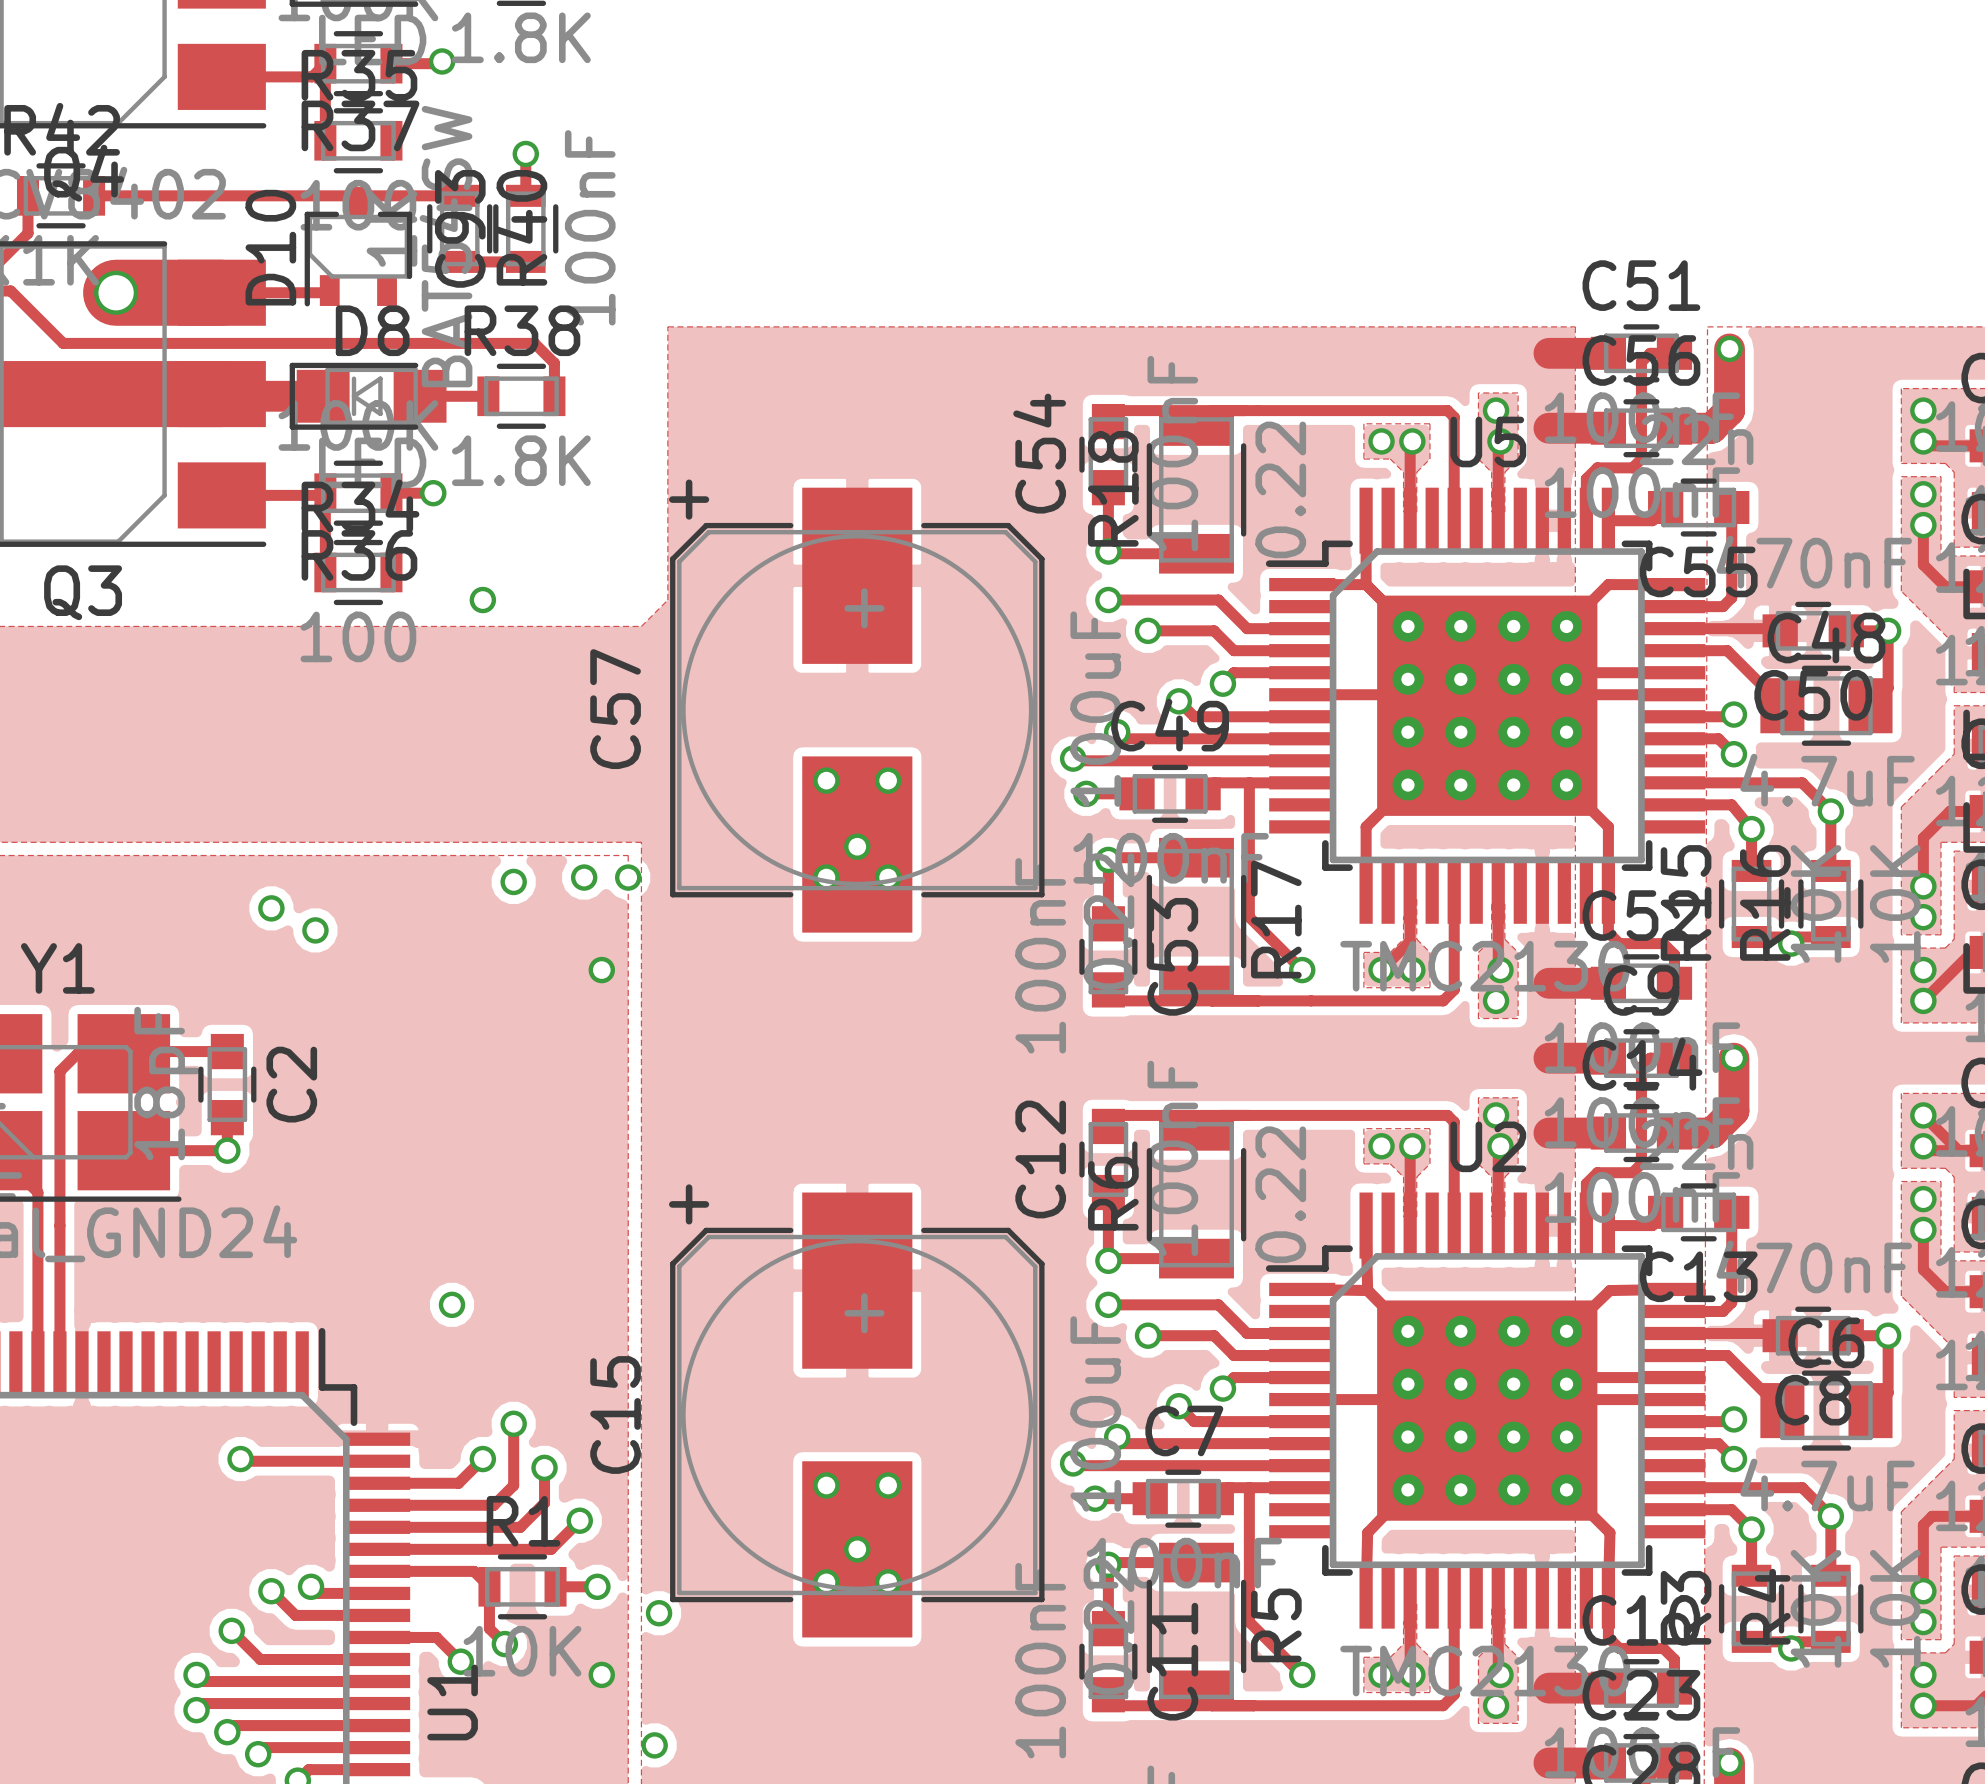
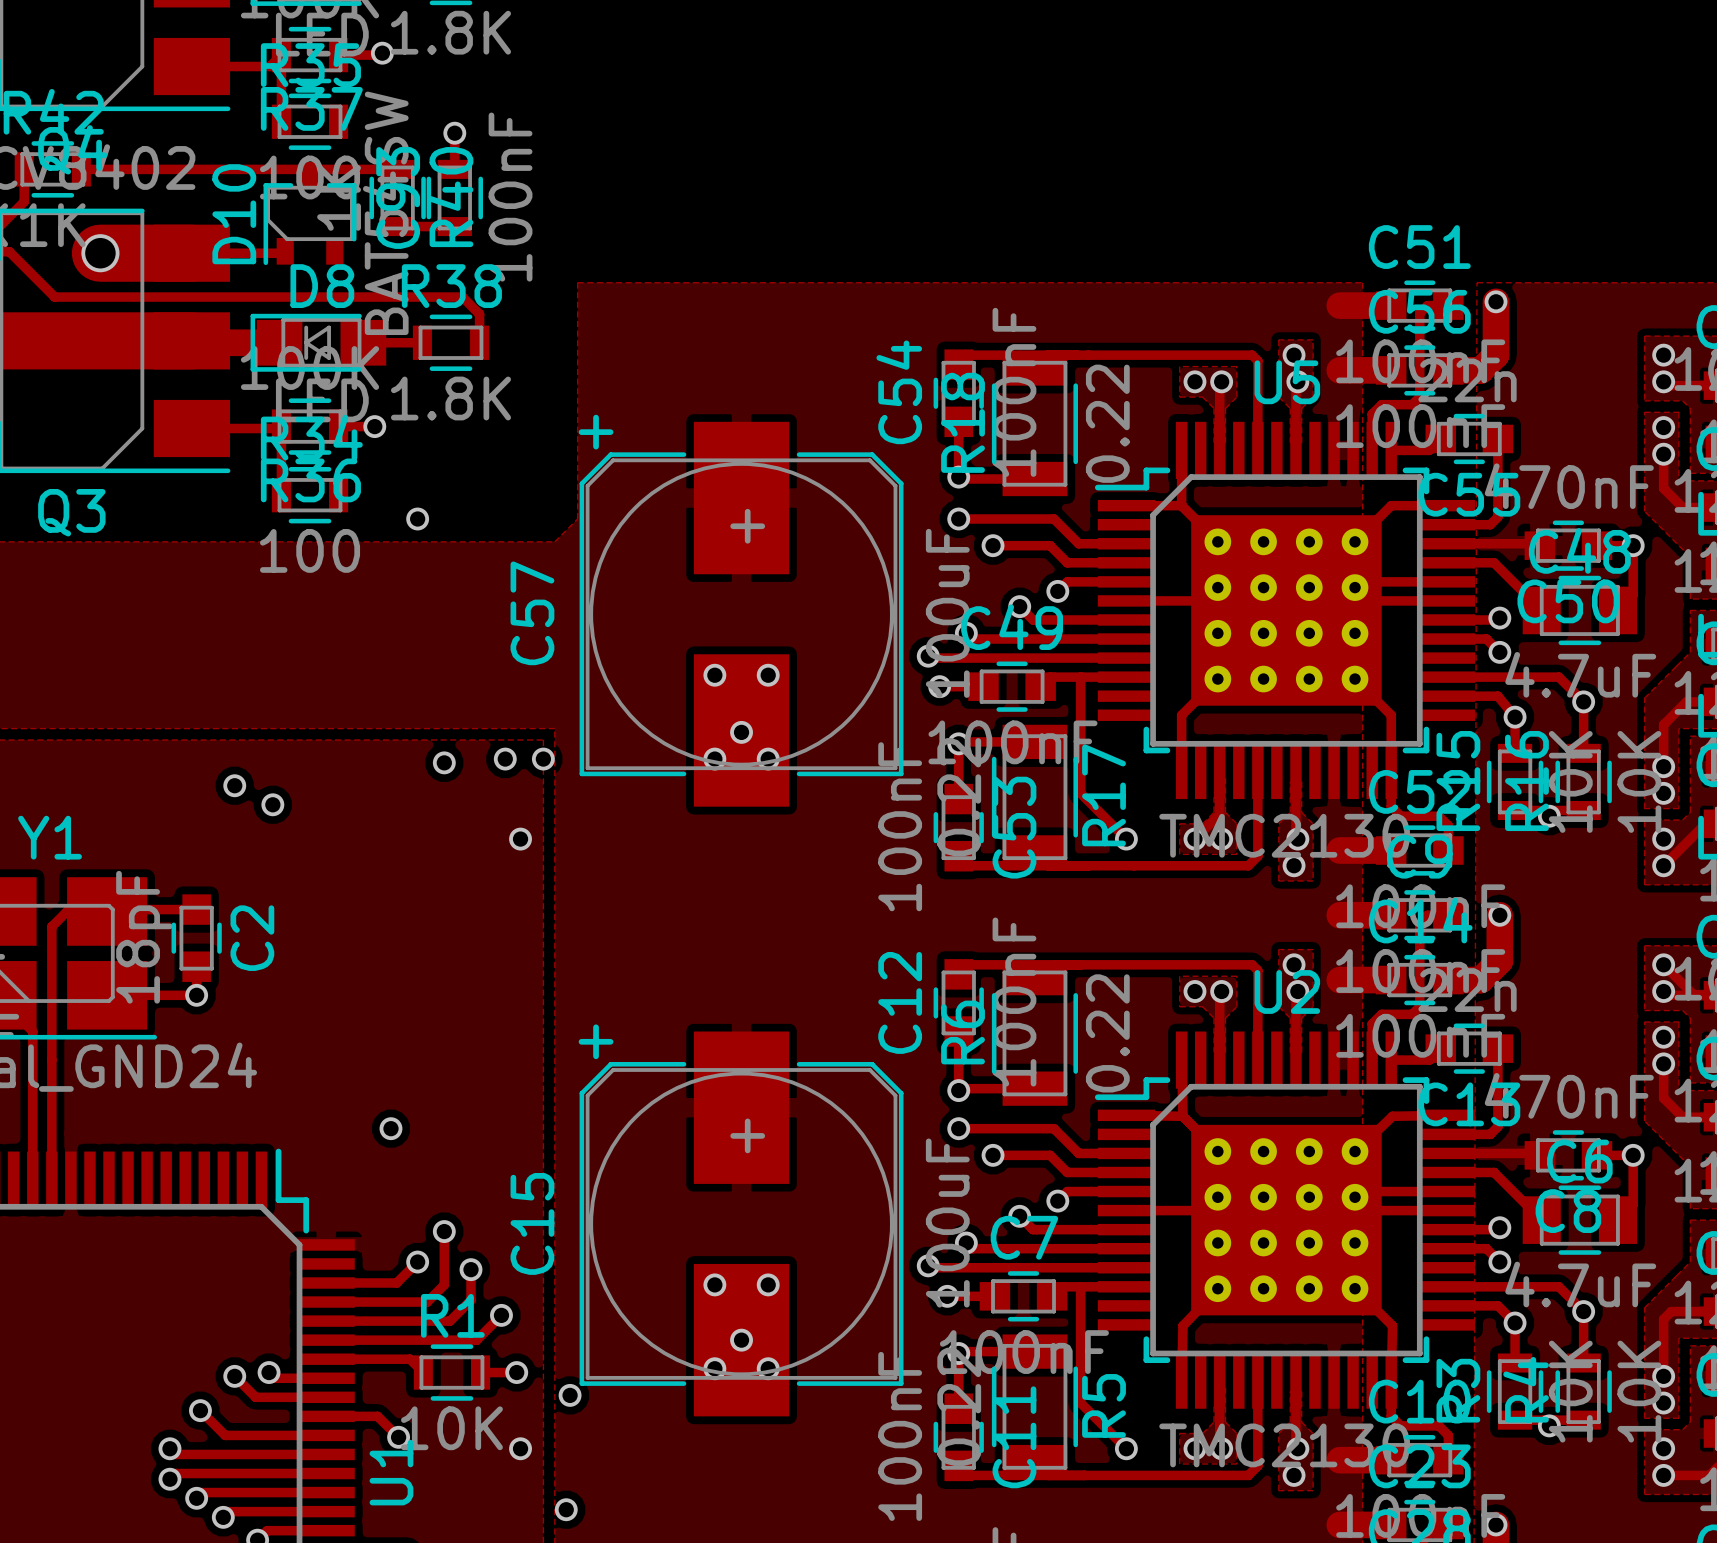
track: (240, 1459) (242, 1461) (377, 1461) -> none
via: (240, 1459) -> none
track: (489, 1586) (489, 1628) (504, 1644) -> none
via: (504, 1644) -> none

